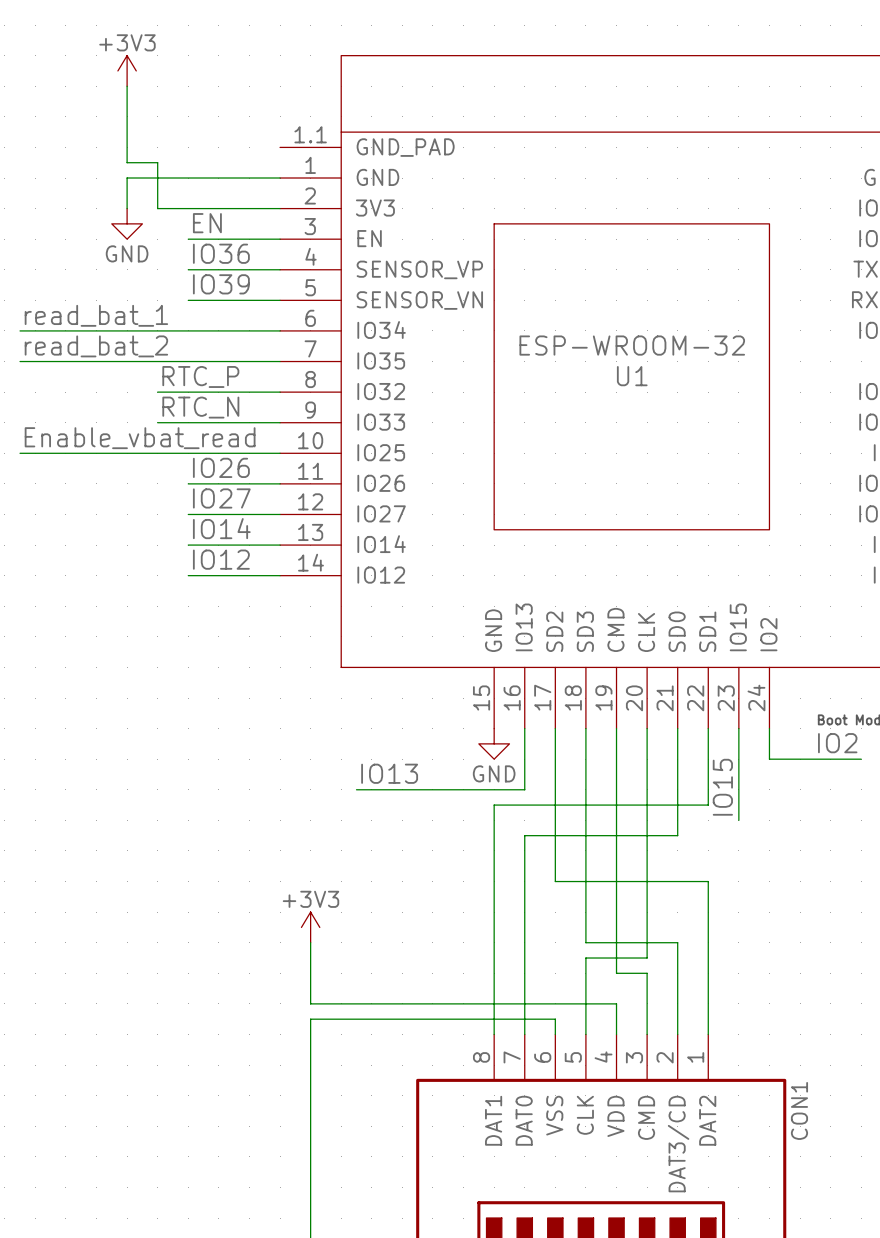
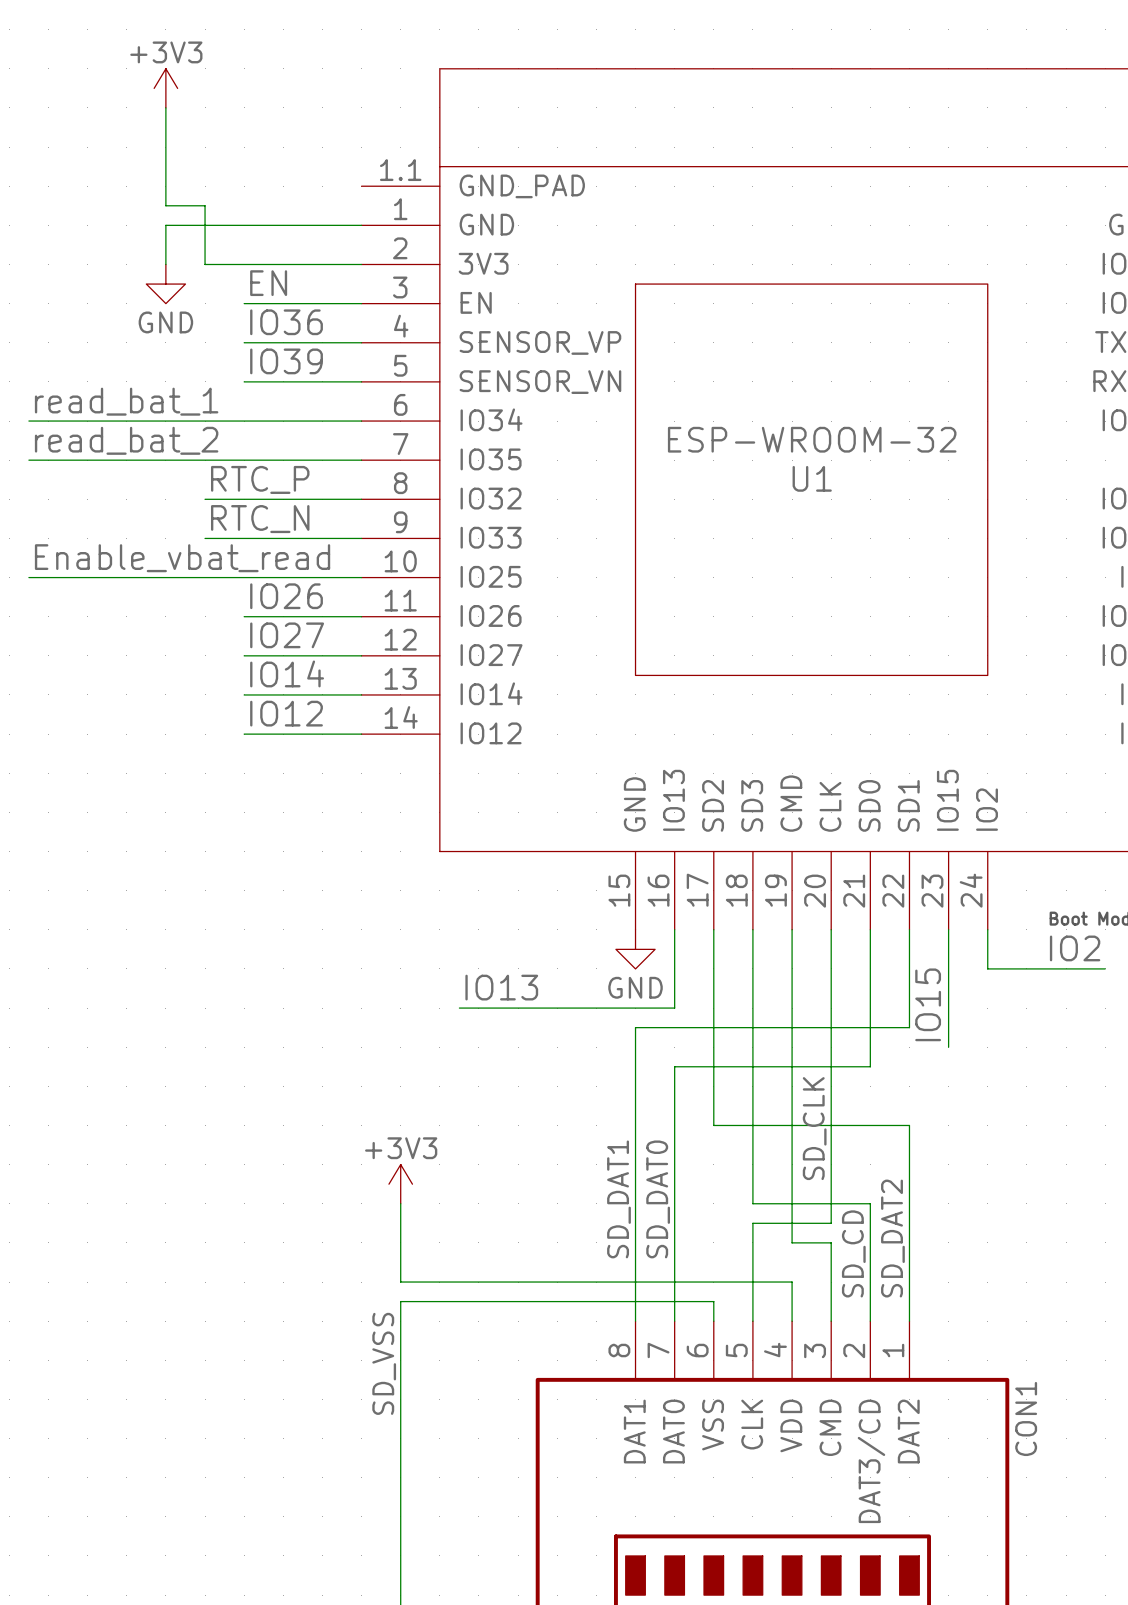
label: none -> SD_CLK (814, 1128)
label: none -> SD_DAT1 (618, 1199)
label: none -> SD_DAT0 (658, 1199)
label: none -> SD_DAT2 (892, 1238)
label: none -> SD_CD (853, 1253)
label: none -> SD_VSS (384, 1363)

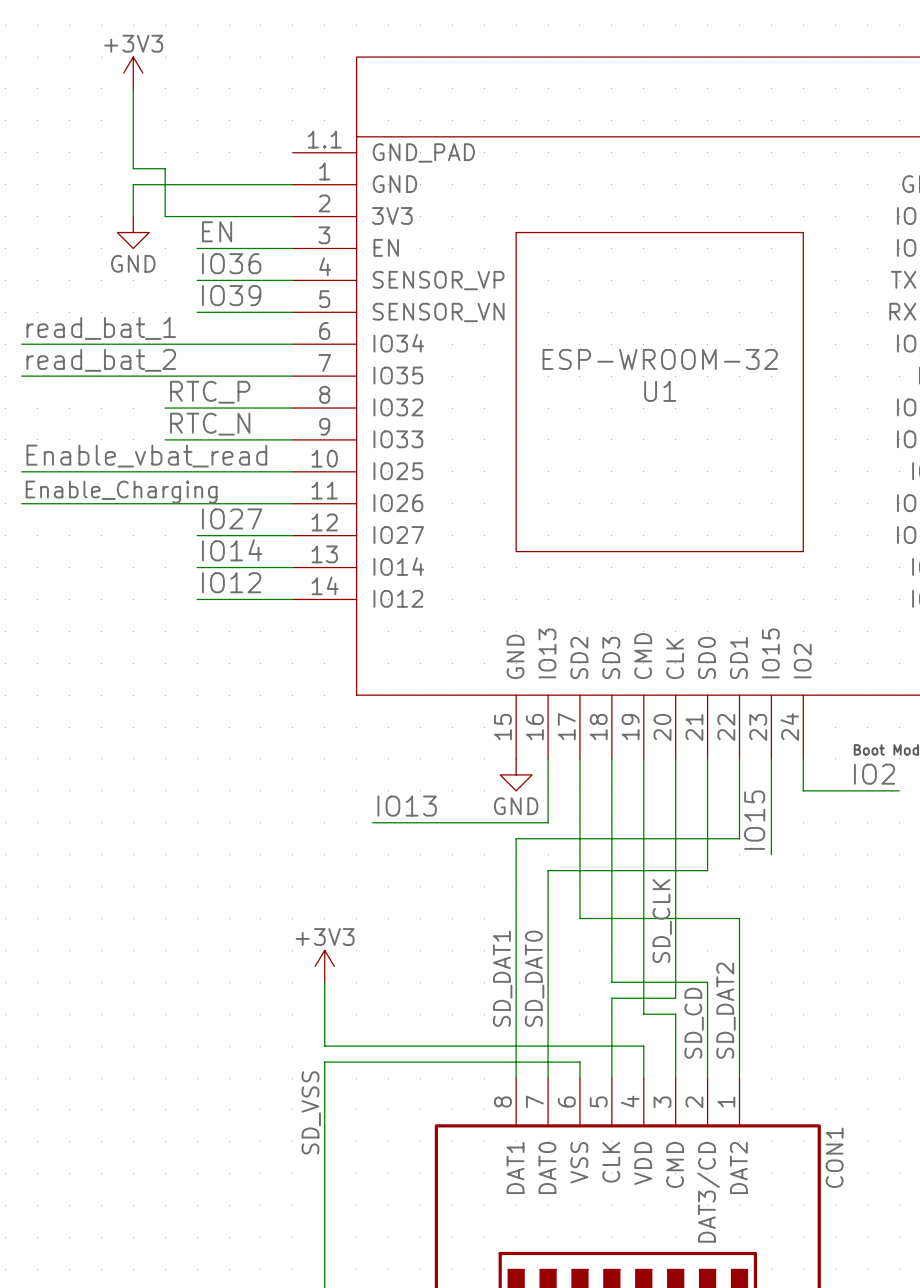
label: IO26 (286, 596) -> none
label: none -> Enable_Charging (121, 492)
wire: none -> (21, 503) (197, 503)

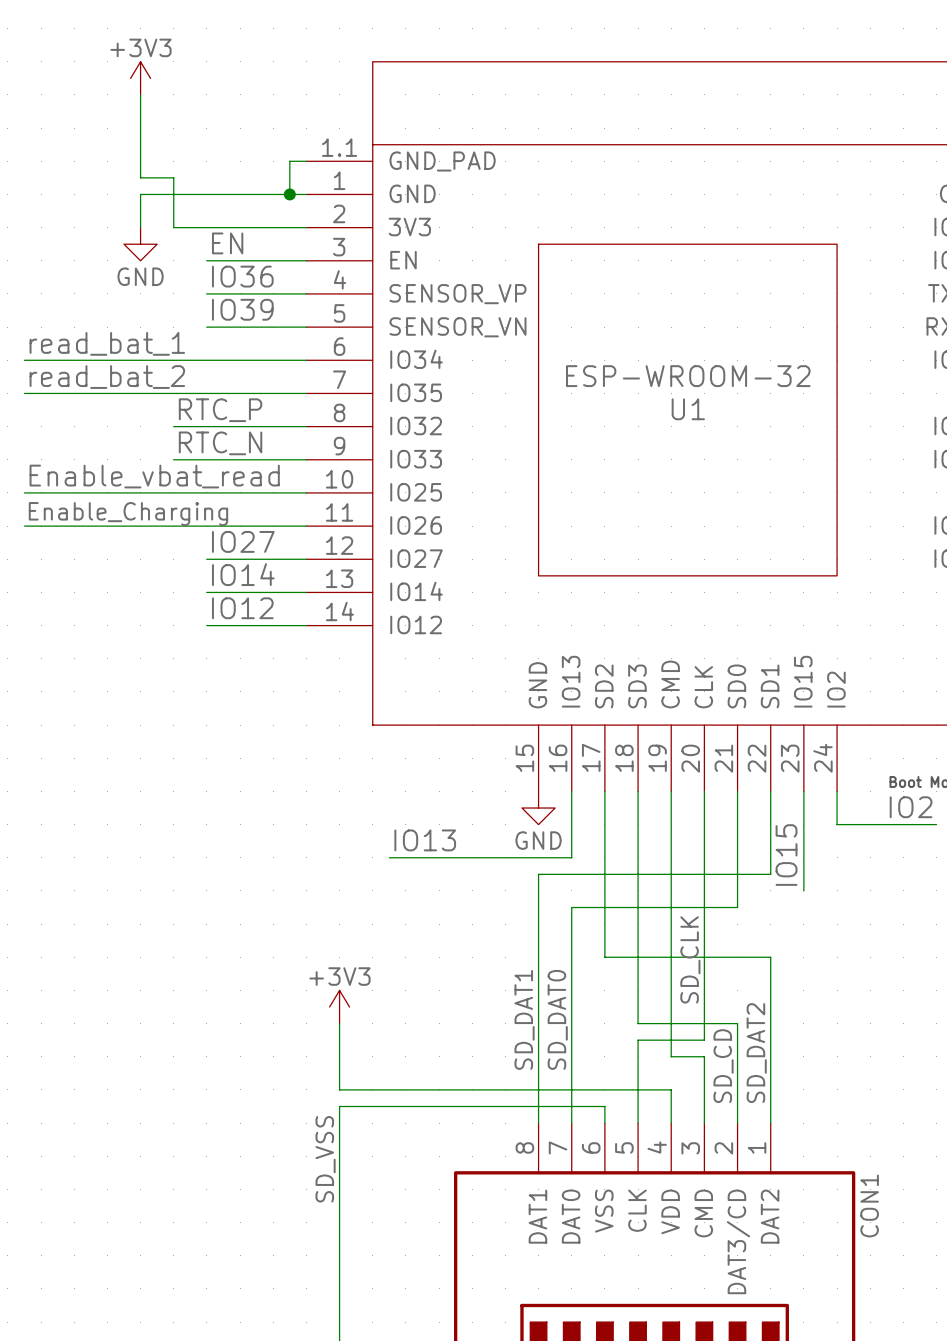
wire: none -> (306, 161) (289, 161) (289, 194)
junction: none -> (289, 194)

